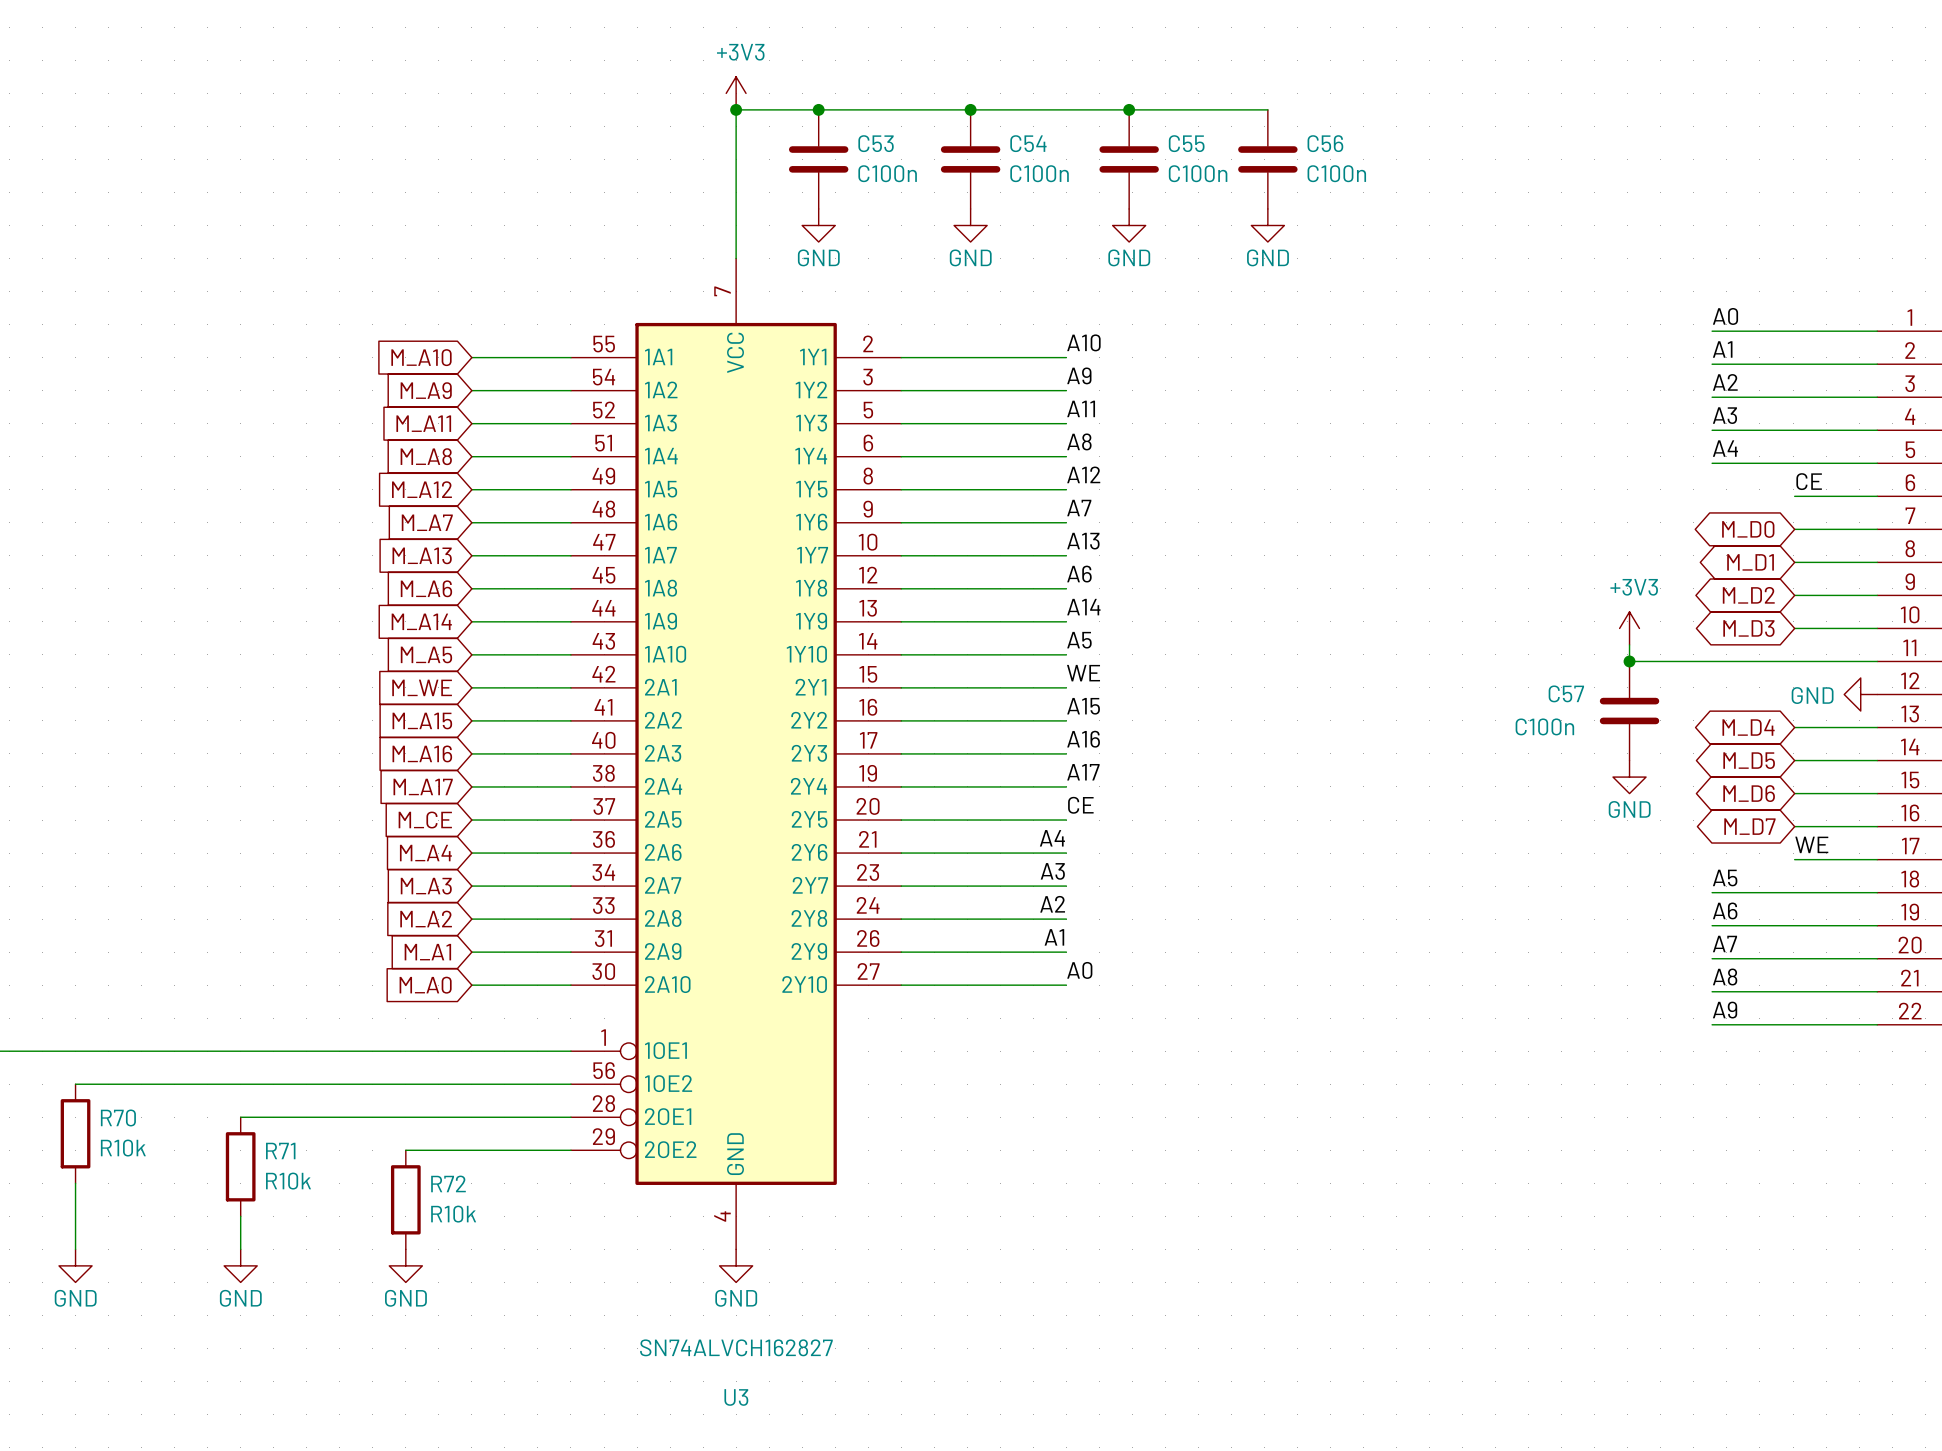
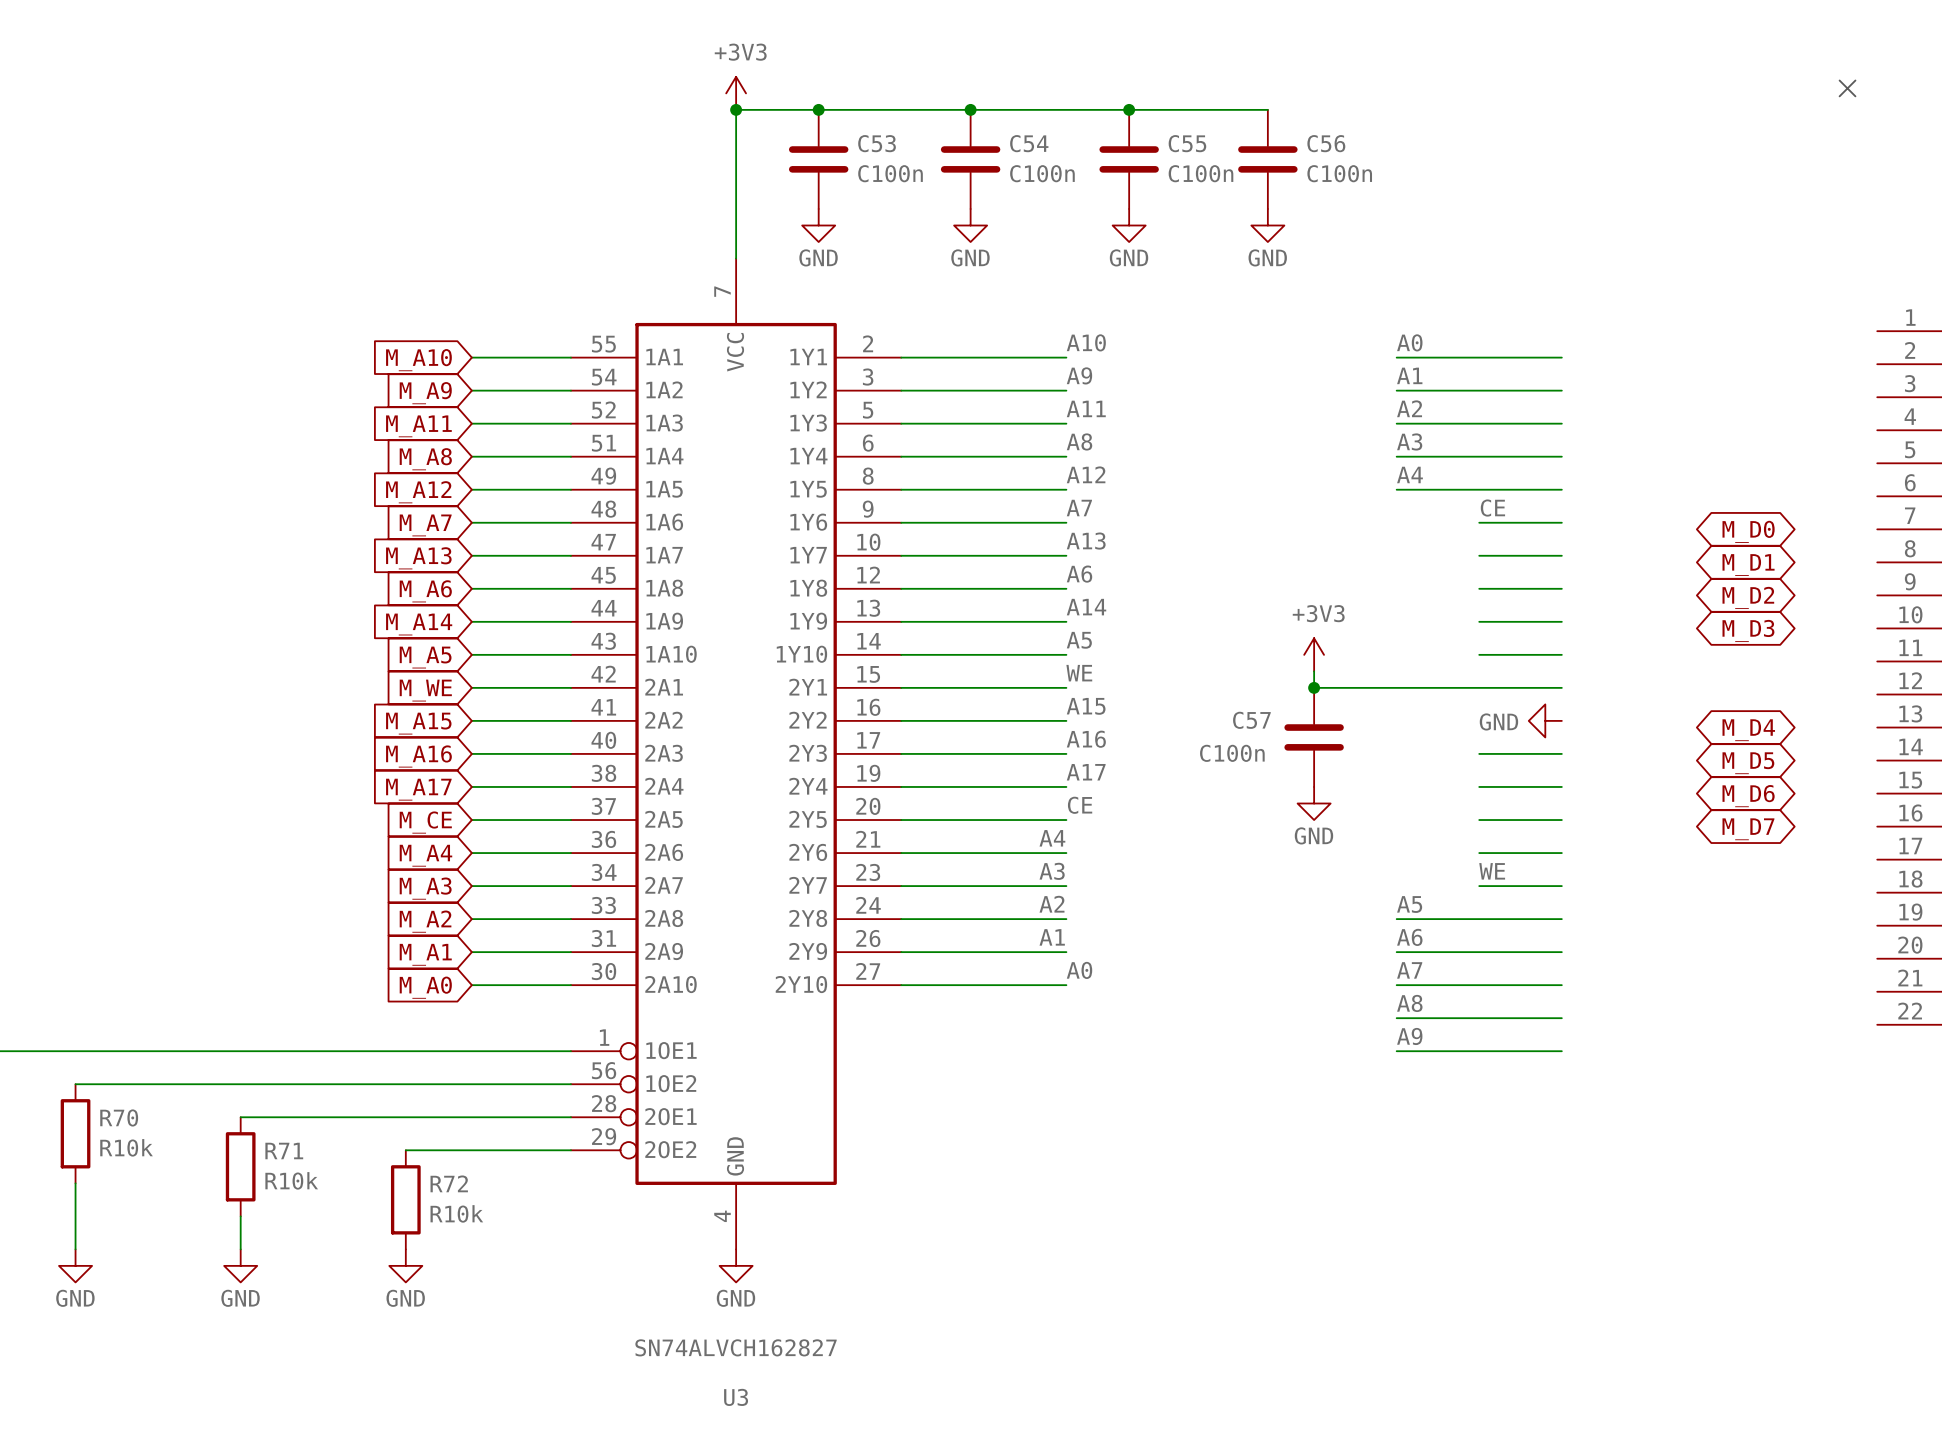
no-connect mark: none -> (1847, 88)
label position: A0 (1725, 316) -> A0 (1409, 342)
wire: (1712, 331) (1877, 331) -> (1396, 357) (1561, 357)
label position: A1 (1722, 349) -> A1 (1409, 375)
wire: (1712, 364) (1877, 364) -> (1396, 390) (1561, 390)
label position: A2 (1725, 382) -> A2 (1409, 408)
wire: (1712, 397) (1877, 397) -> (1396, 423) (1561, 423)
label position: A3 (1724, 415) -> A3 (1409, 441)
wire: (1712, 430) (1877, 430) -> (1396, 456) (1561, 456)
label position: A4 (1725, 448) -> A4 (1409, 474)
wire: (1712, 463) (1877, 463) -> (1396, 489) (1561, 489)
label position: CE (1809, 481) -> CE (1492, 508)
wire: (1794, 496) (1877, 496) -> (1479, 522) (1561, 522)
wire: (1794, 529) (1877, 529) -> (1479, 555) (1561, 555)
wire: (1794, 562) (1877, 562) -> (1479, 588) (1561, 588)
wire: (1794, 595) (1877, 595) -> (1479, 621) (1561, 621)
power symbol position: +3V3 (1629, 628) -> +3V3 (1314, 654)
wire: (1794, 628) (1877, 628) -> (1479, 654) (1561, 654)
wire: (1629, 644) (1629, 661) (1877, 661) -> (1314, 671) (1314, 687) (1561, 687)
junction: (1629, 661) -> none
junction: none -> (1314, 687)
power symbol: GND (1860, 694) -> none
C57 position: (1629, 711) -> (1314, 737)
wire: (1794, 727) (1877, 727) -> (1479, 753) (1561, 753)
wire: (1794, 760) (1877, 760) -> (1479, 786) (1561, 786)
power symbol rotation: 0° (1629, 777) -> 90° clockwise (1545, 720)
power symbol position: GND (1629, 777) -> GND (1545, 720)
wire: (1794, 793) (1877, 793) -> (1479, 820) (1561, 820)
power symbol: none -> GND (1314, 803)
wire: (1794, 826) (1877, 826) -> (1479, 853) (1561, 853)
label position: WE (1811, 844) -> WE (1492, 871)
wire: (1794, 859) (1877, 859) -> (1479, 886) (1561, 886)
label position: A5 (1725, 878) -> A5 (1409, 904)
wire: (1712, 892) (1877, 892) -> (1396, 919) (1561, 919)
label position: A6 (1725, 910) -> A6 (1409, 937)
wire: (1712, 925) (1877, 925) -> (1396, 952) (1561, 952)
label position: A7 (1724, 943) -> A7 (1409, 970)
wire: (1712, 958) (1877, 958) -> (1396, 985) (1561, 985)
label position: A8 (1725, 976) -> A8 (1409, 1003)
wire: (1712, 991) (1877, 991) -> (1396, 1018) (1561, 1018)
label position: A9 (1725, 1010) -> A9 (1409, 1036)
wire: (1712, 1024) (1877, 1024) -> (1396, 1051) (1561, 1051)

